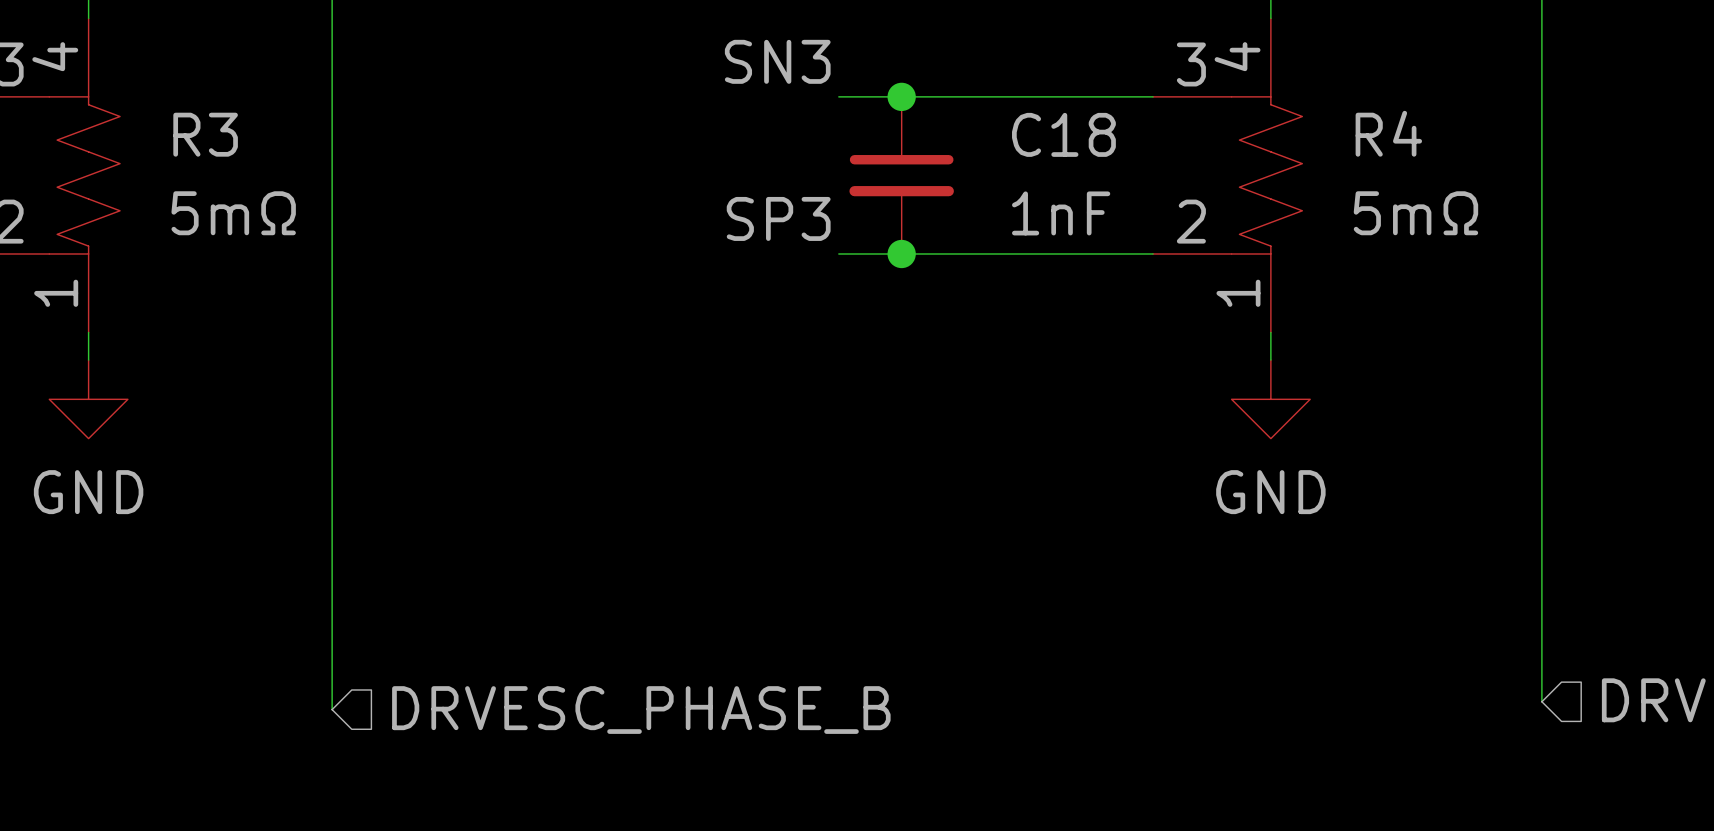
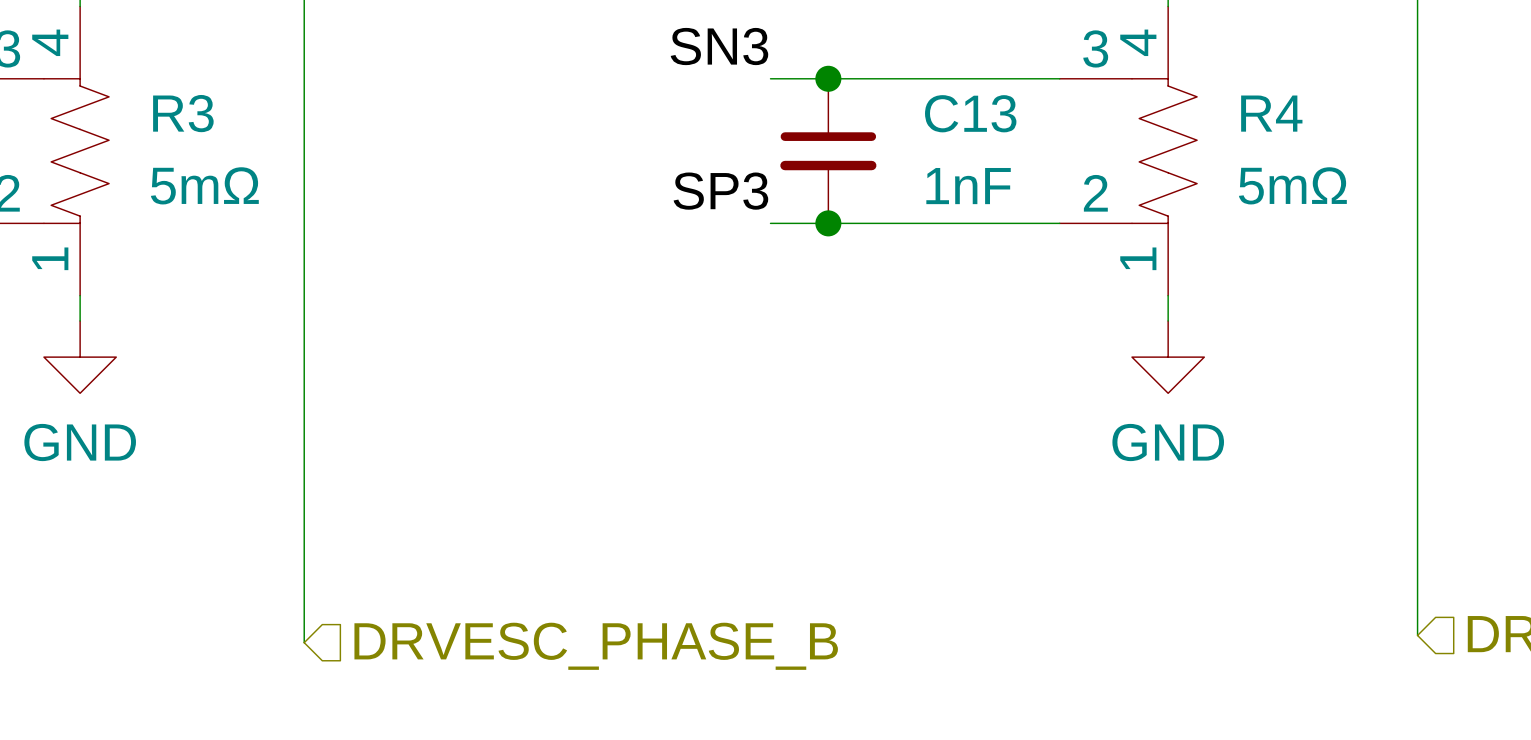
C18 name: C18 (1063, 134) -> C13 (970, 113)

